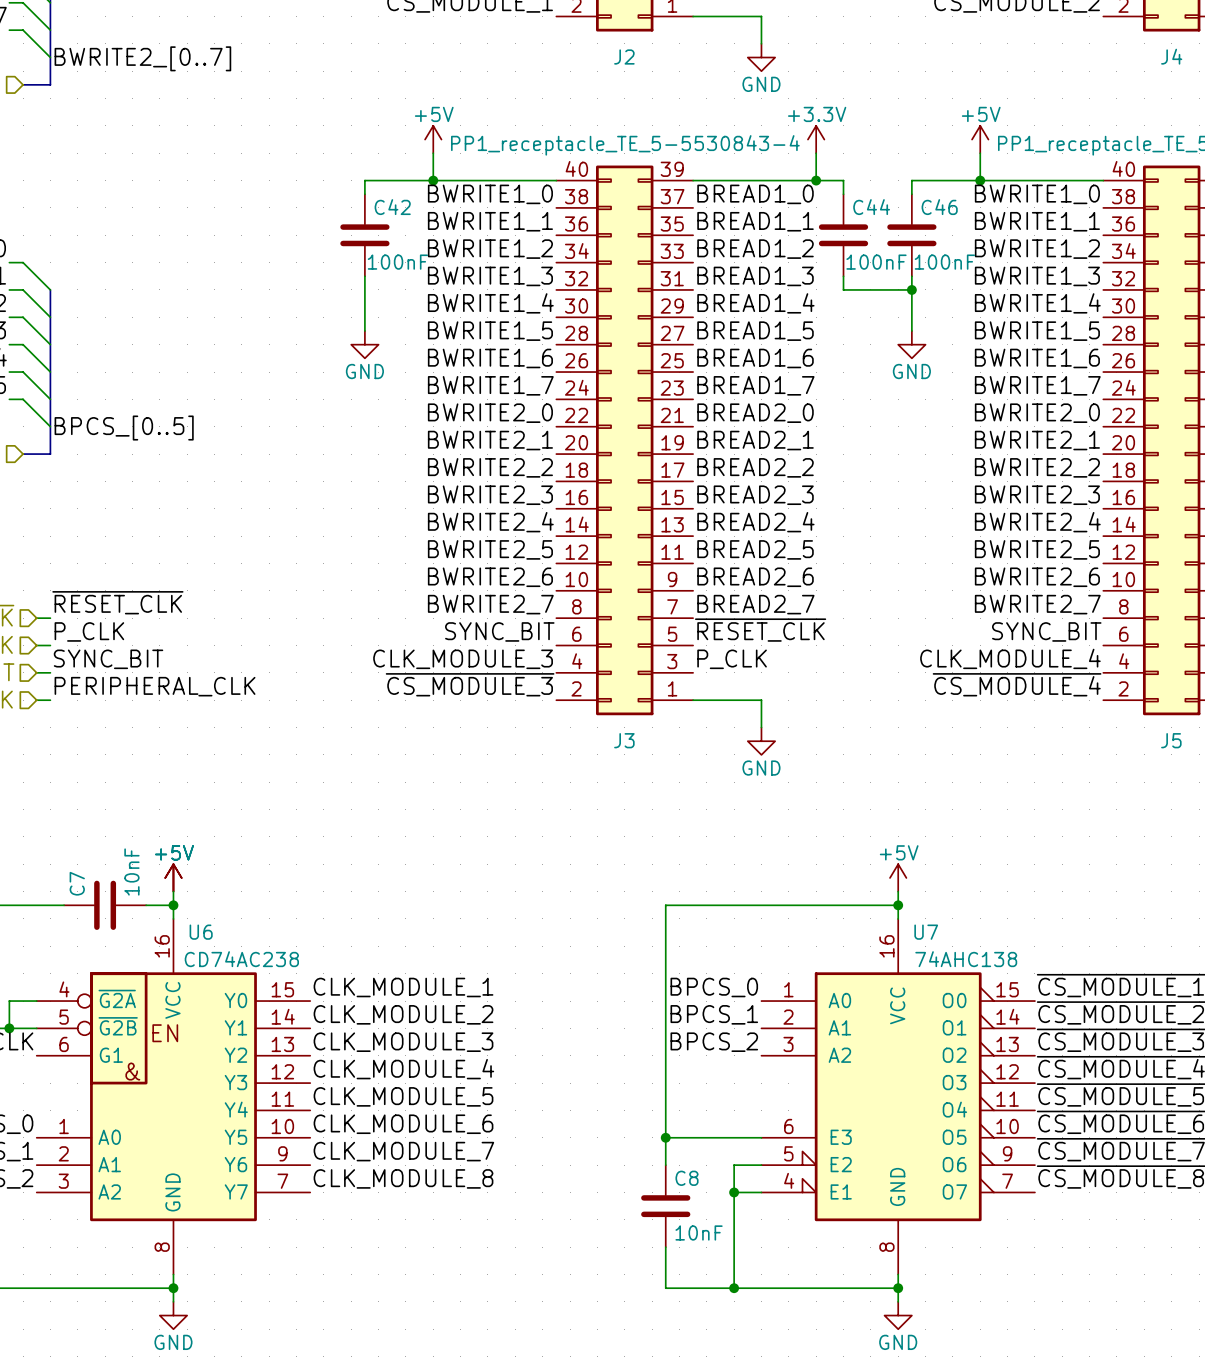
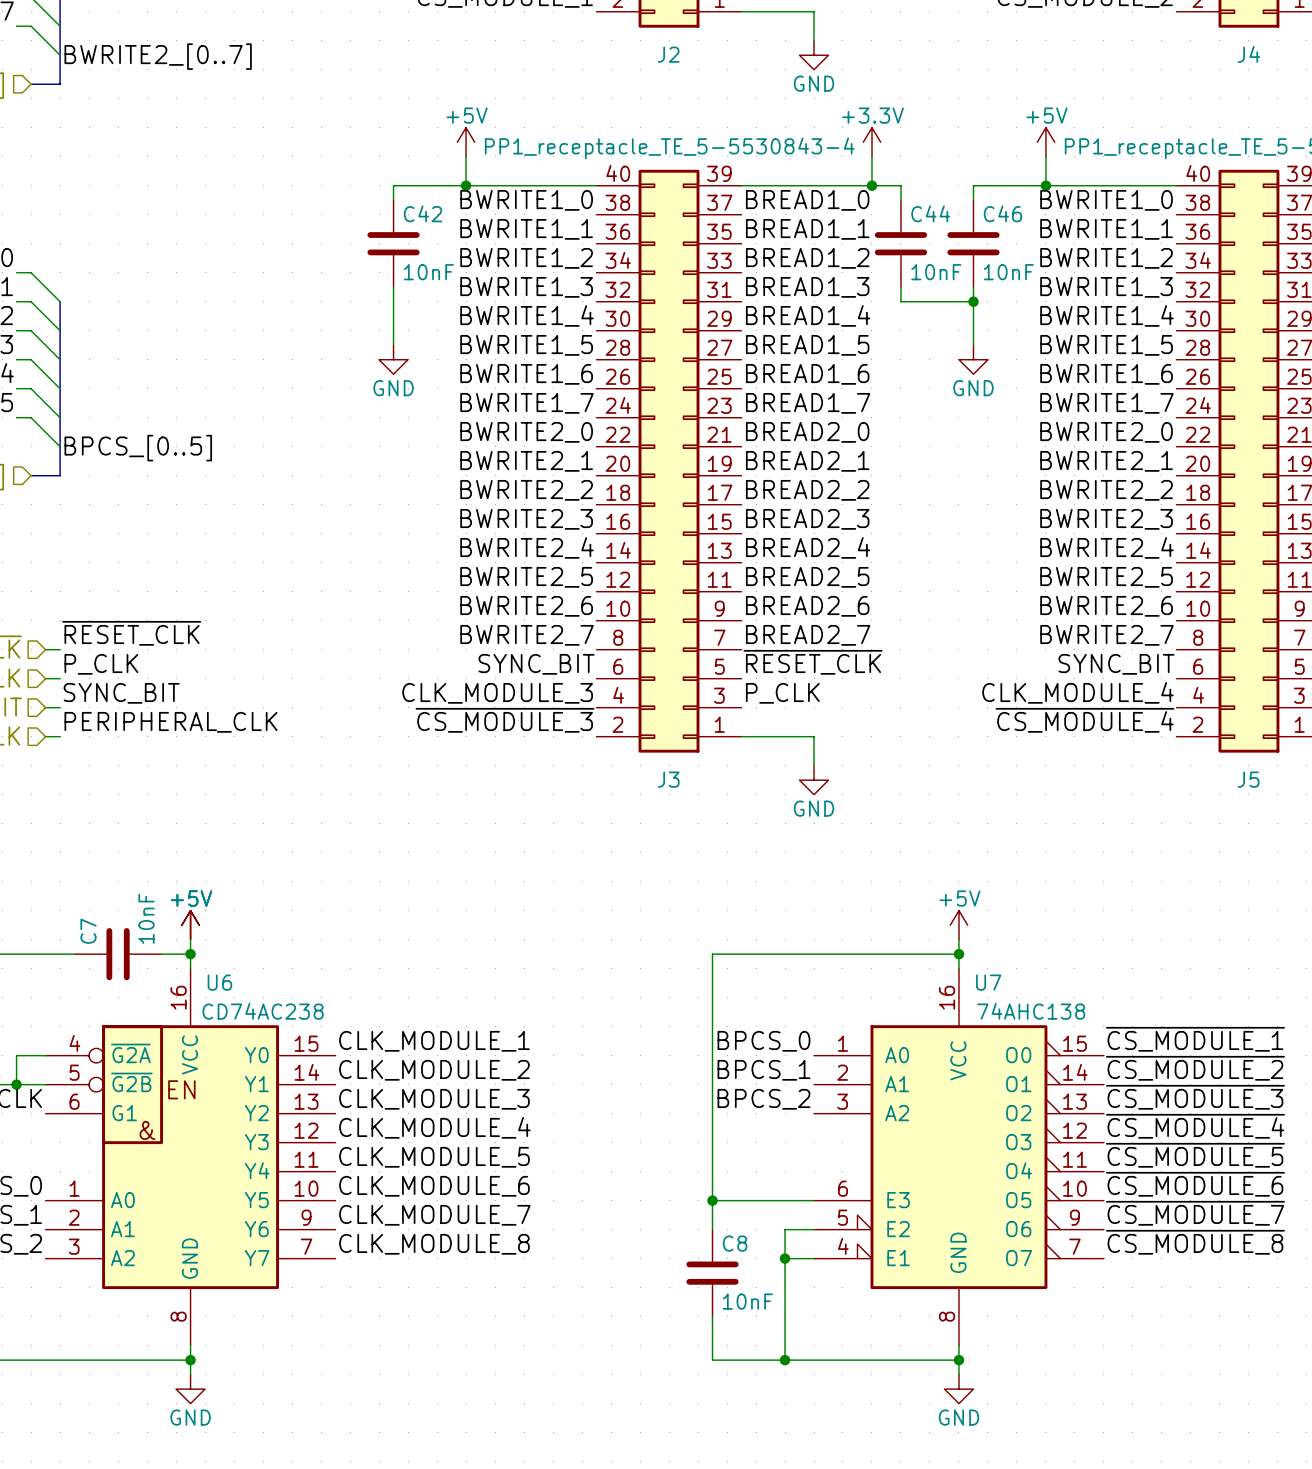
C42 value: 100nF (397, 262) -> 10nF (428, 272)
C44 value: 100nF (876, 262) -> 10nF (936, 272)
C46 value: 100nF (944, 262) -> 10nF (1008, 272)

